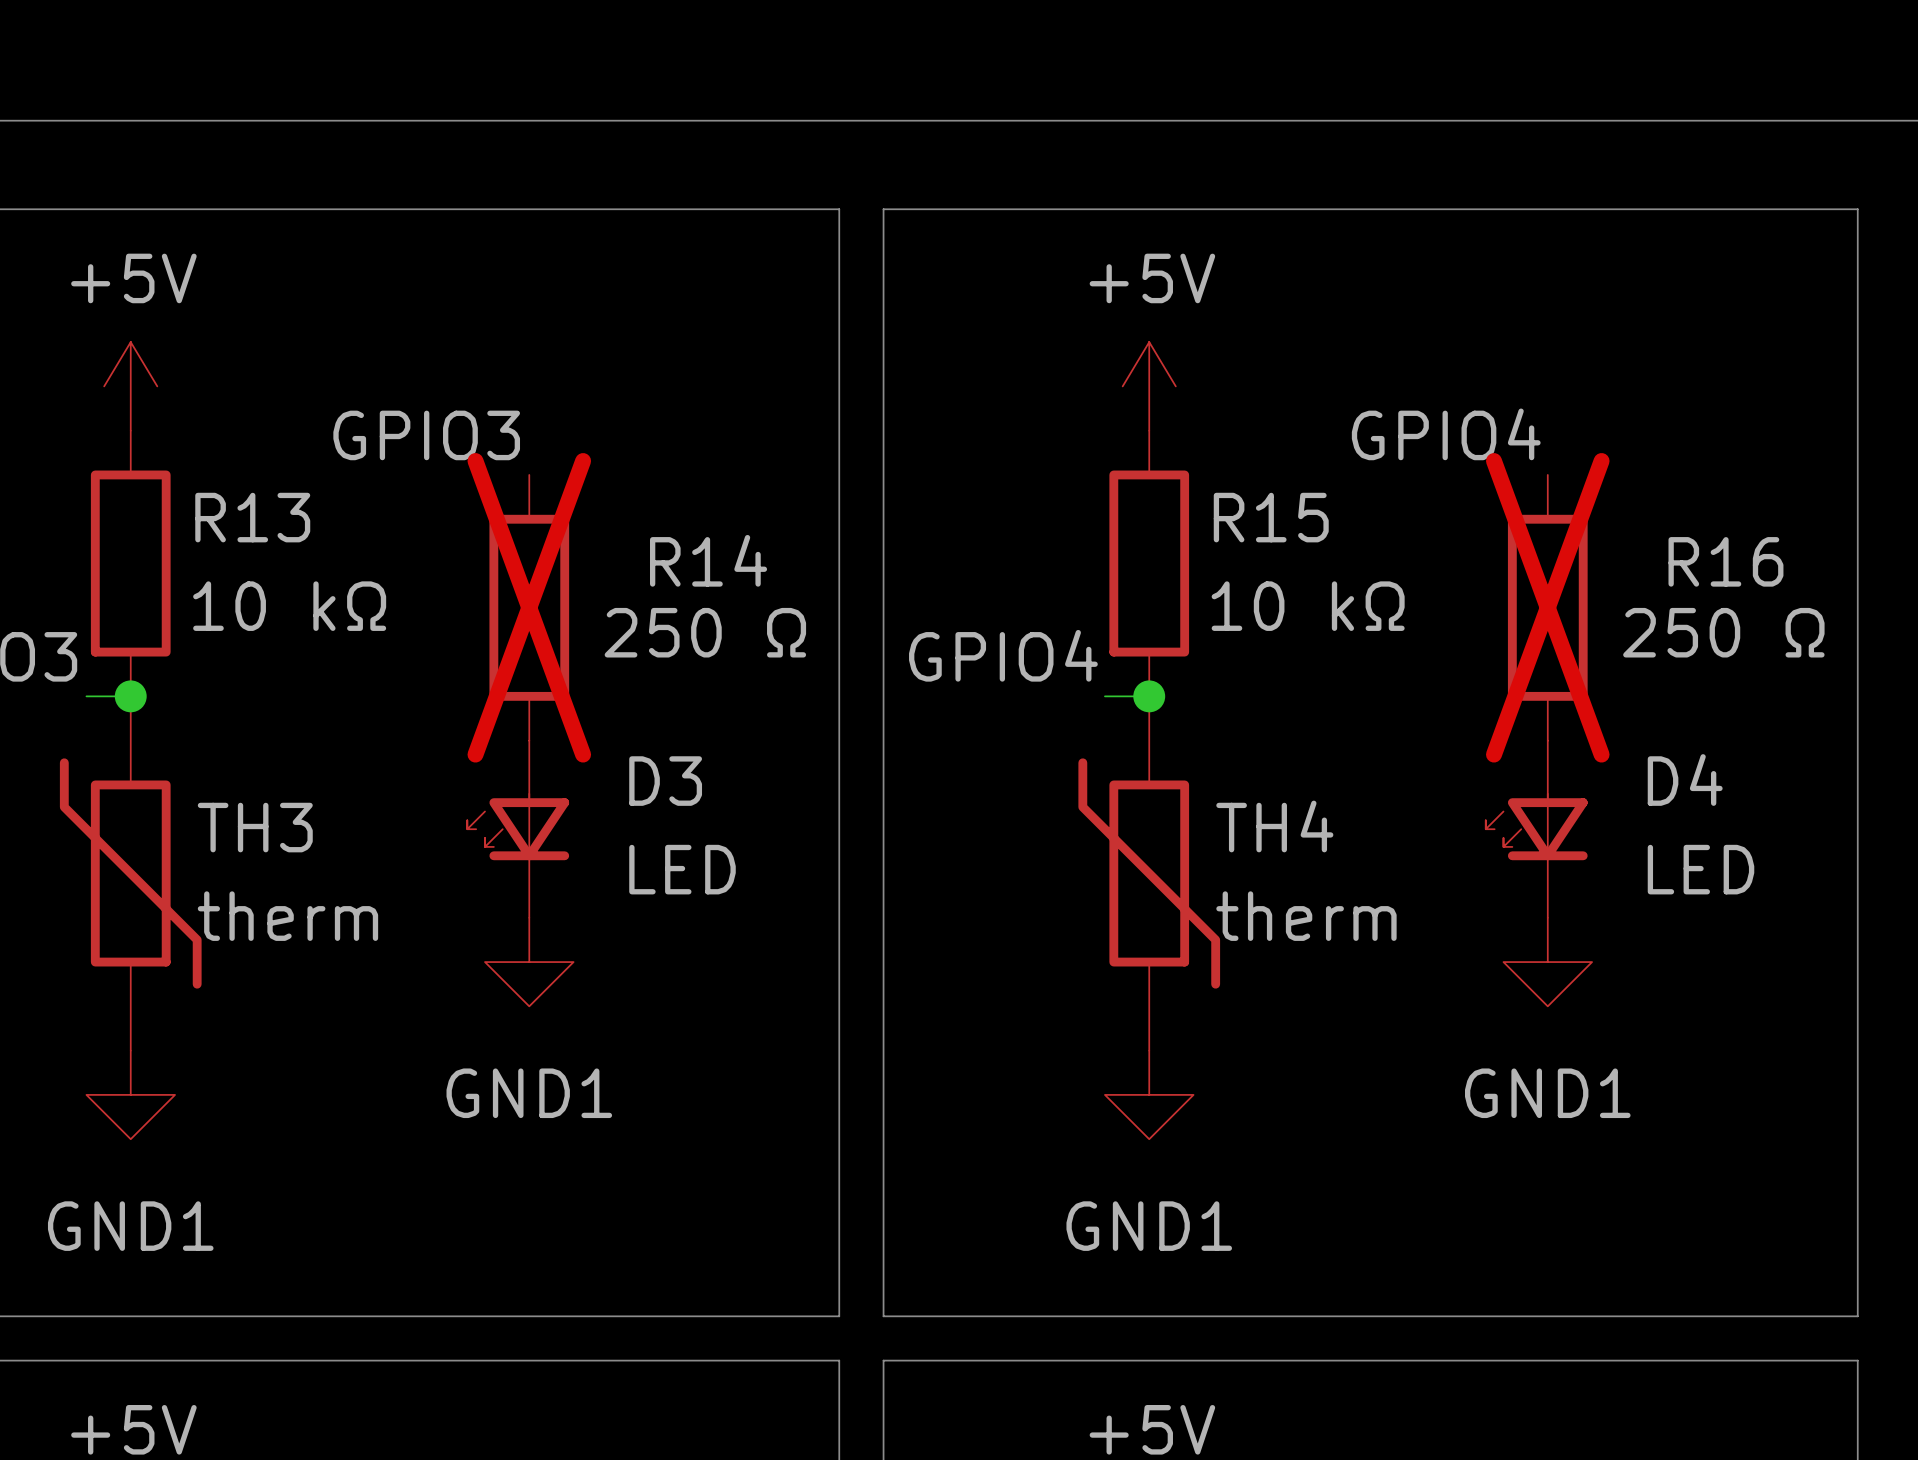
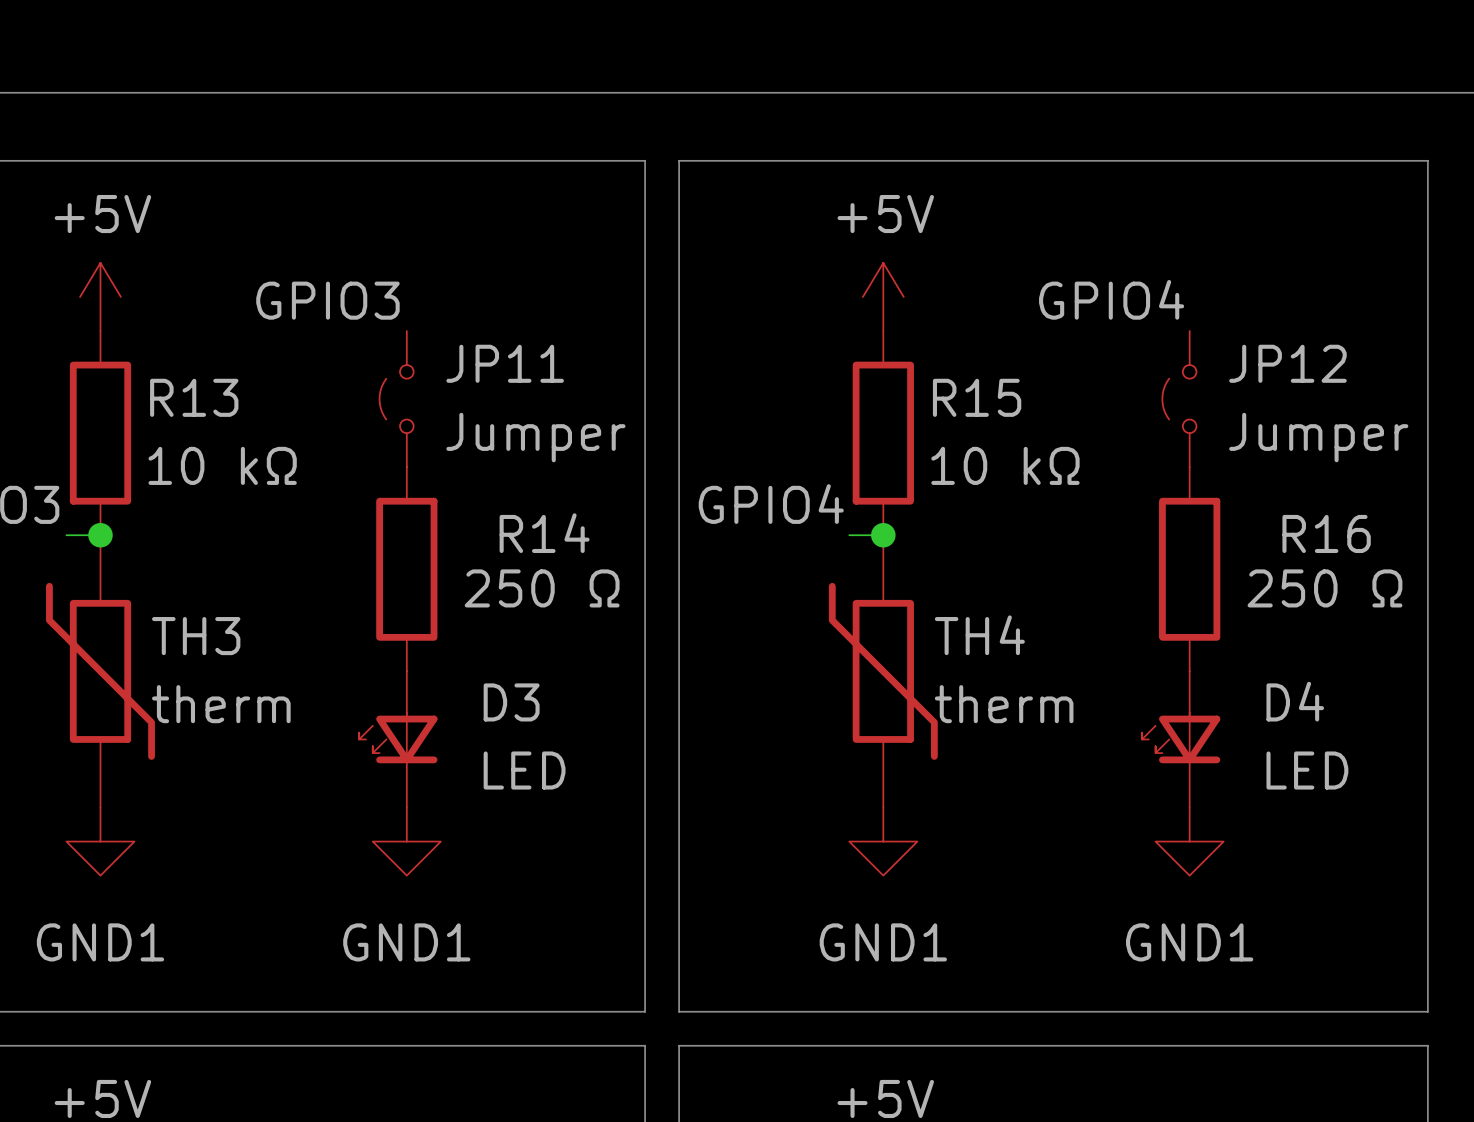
label position: GPIO4 (1446, 434) -> GPIO4 (1111, 299)
label position: GPIO3 (426, 435) -> GPIO3 (327, 300)
JP11: none -> Jumper (396, 399)
JP12: none -> Jumper (1179, 399)
R14 position: (529, 607) -> (406, 569)
R14 do-not-place cross: (529, 607) -> none
R16 position: (1547, 607) -> (1189, 569)
R16 do-not-place cross: (1547, 607) -> none
D3 position: (518, 829) -> (398, 739)
D4 position: (1536, 829) -> (1181, 739)
power symbol position: GND1 (529, 962) -> GND1 (406, 841)
power symbol position: GND1 (1547, 962) -> GND1 (1189, 841)

